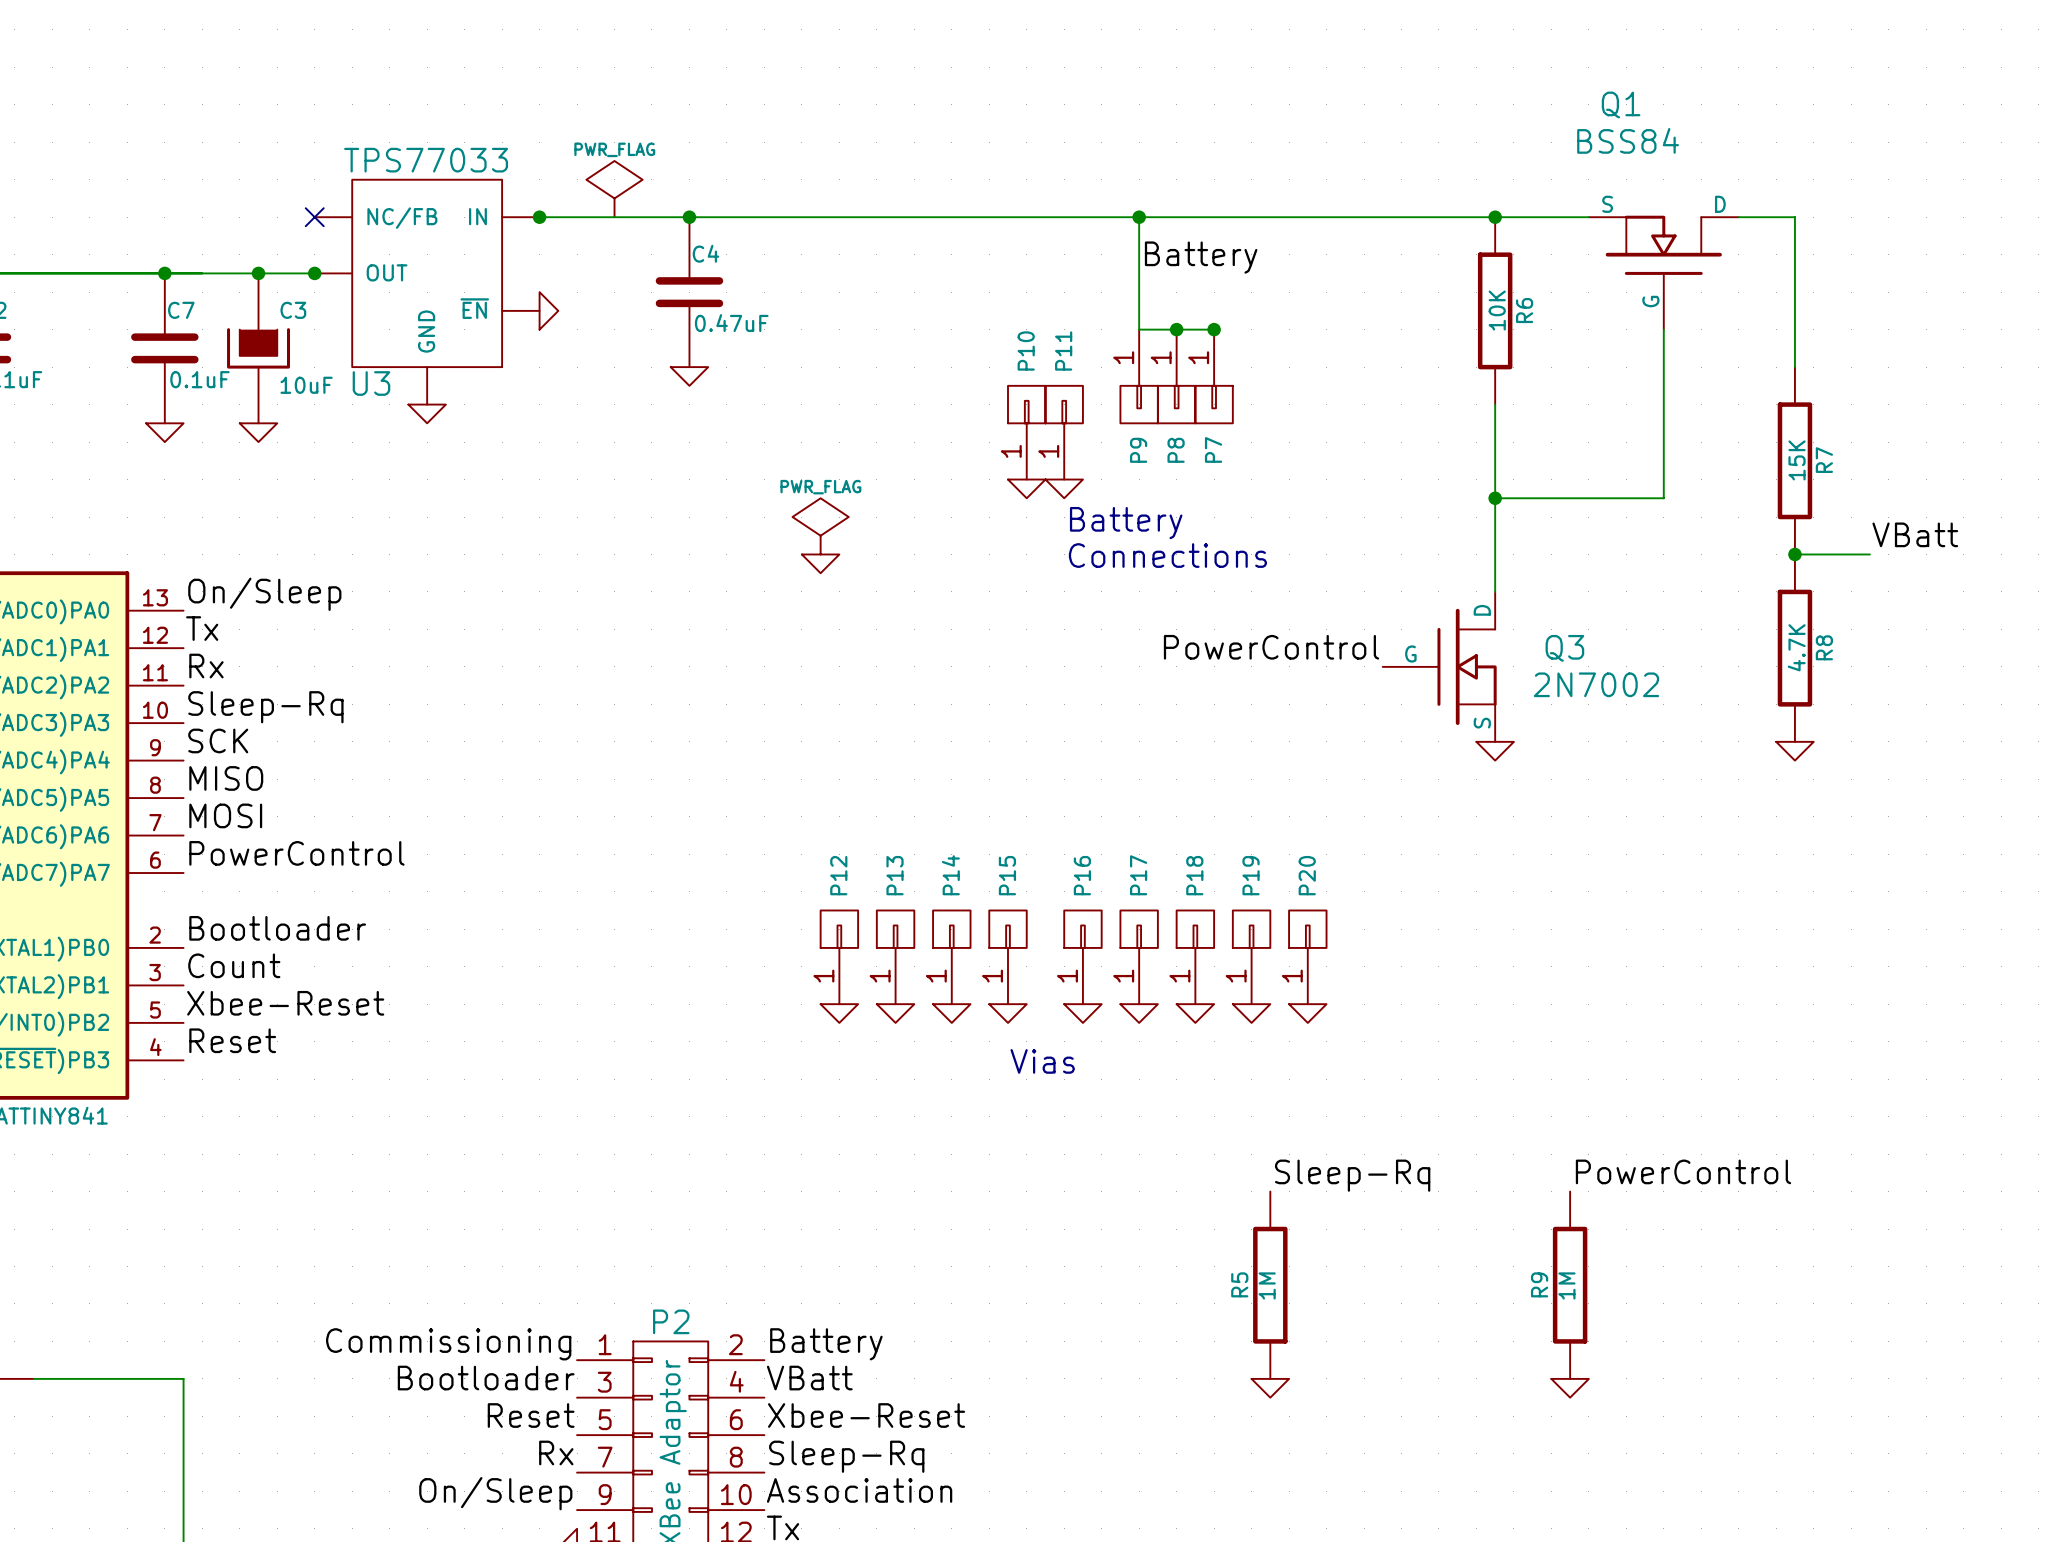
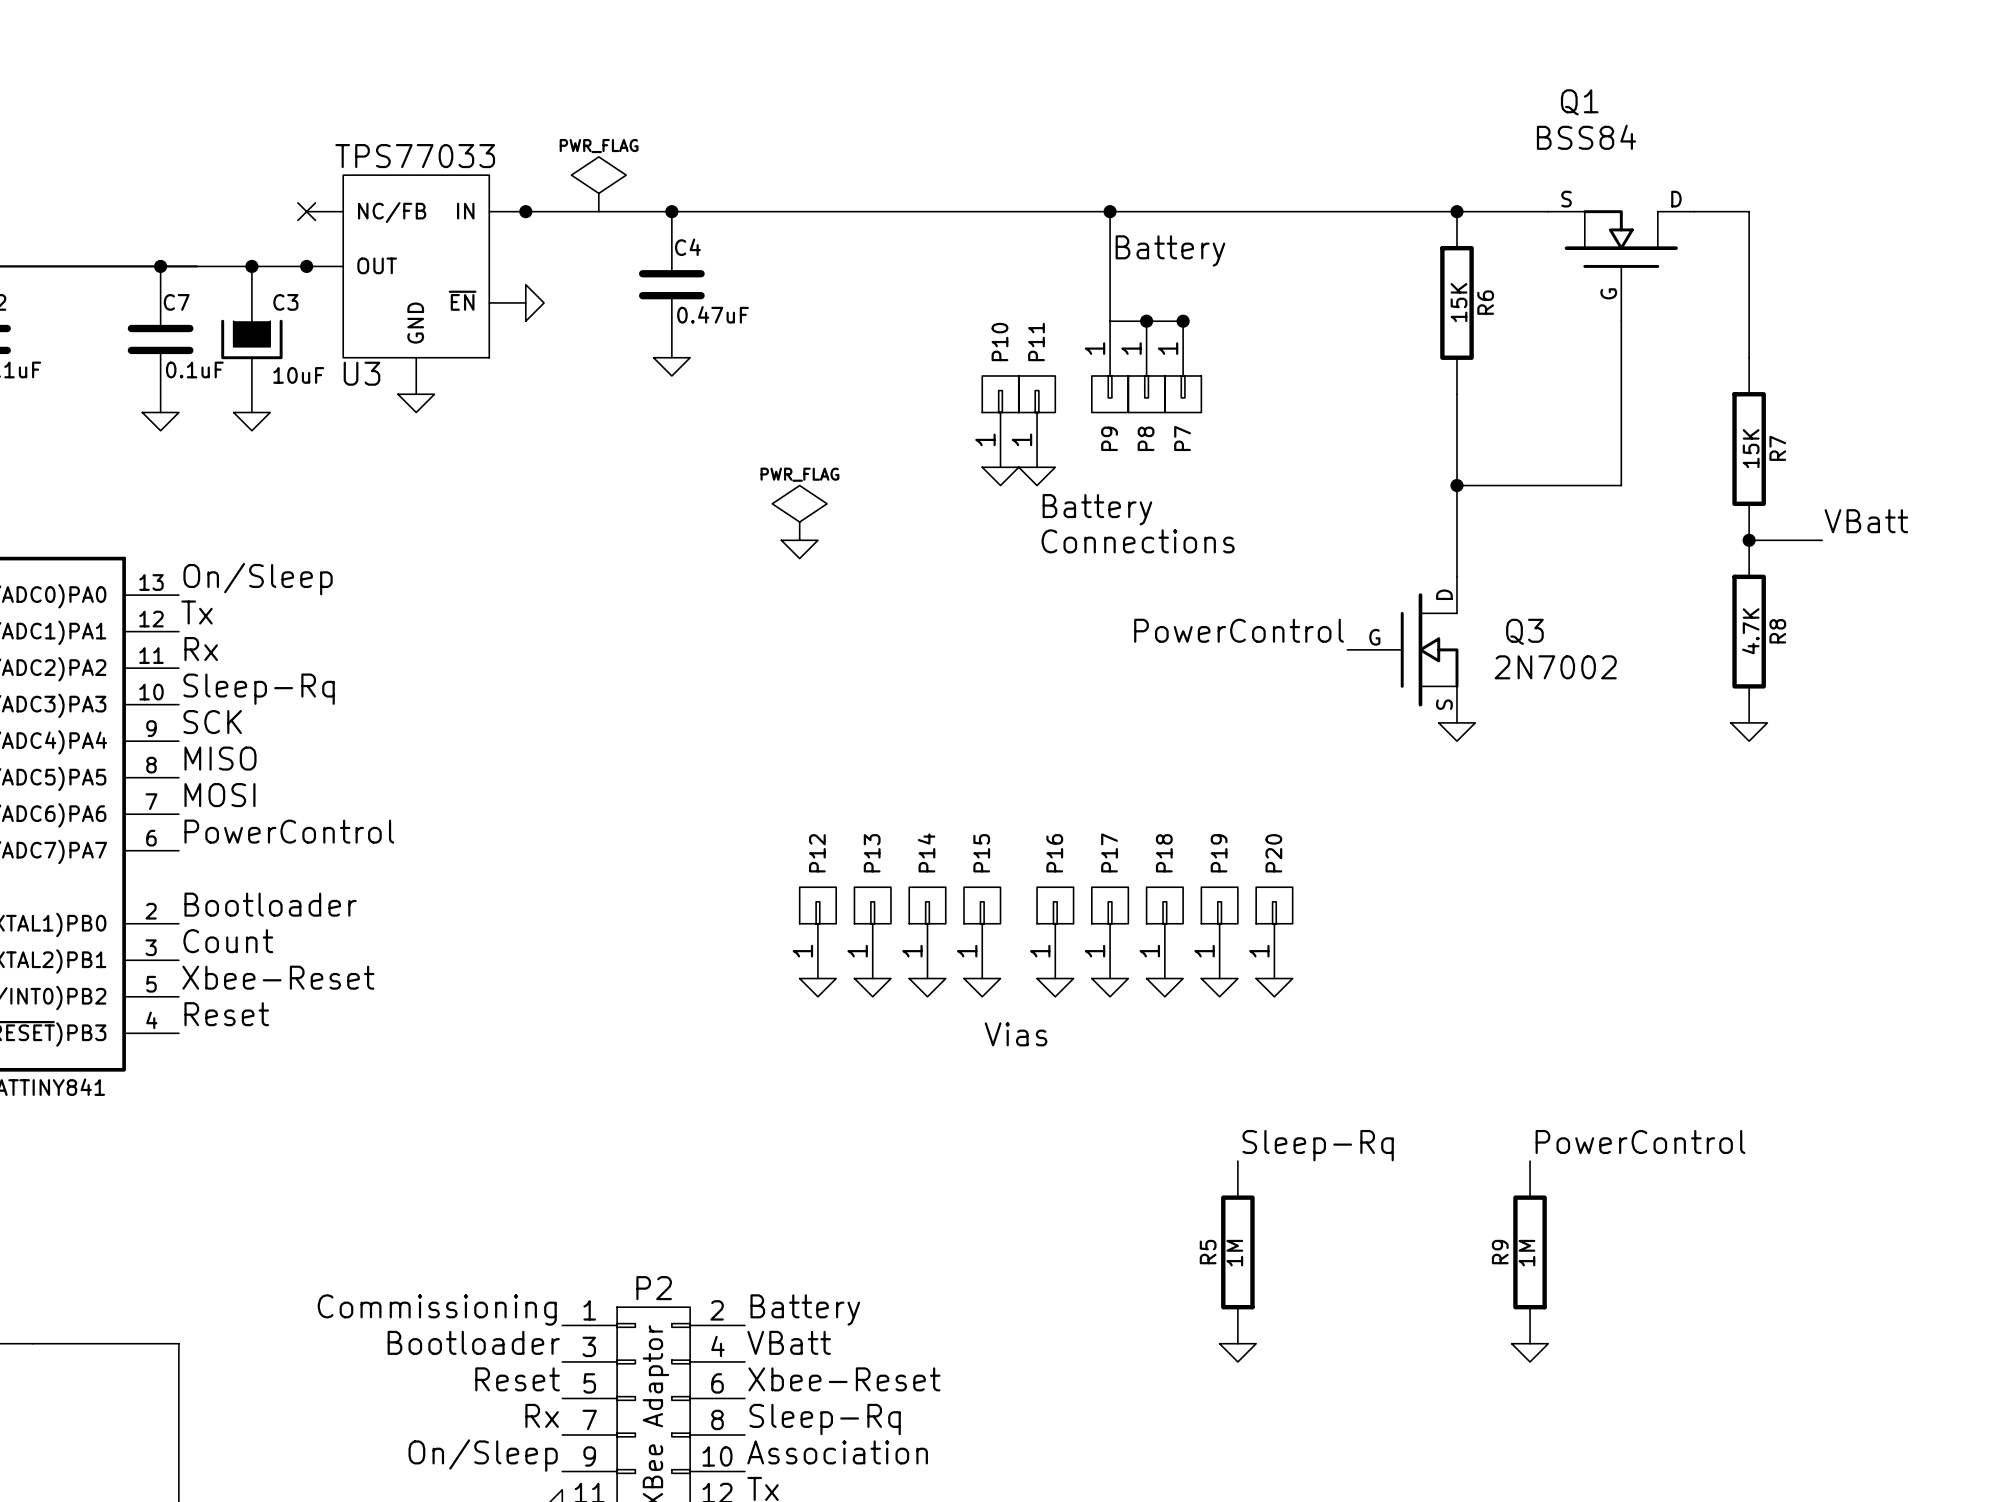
R6 value: 10K (1497, 310) -> 15K (1459, 302)

